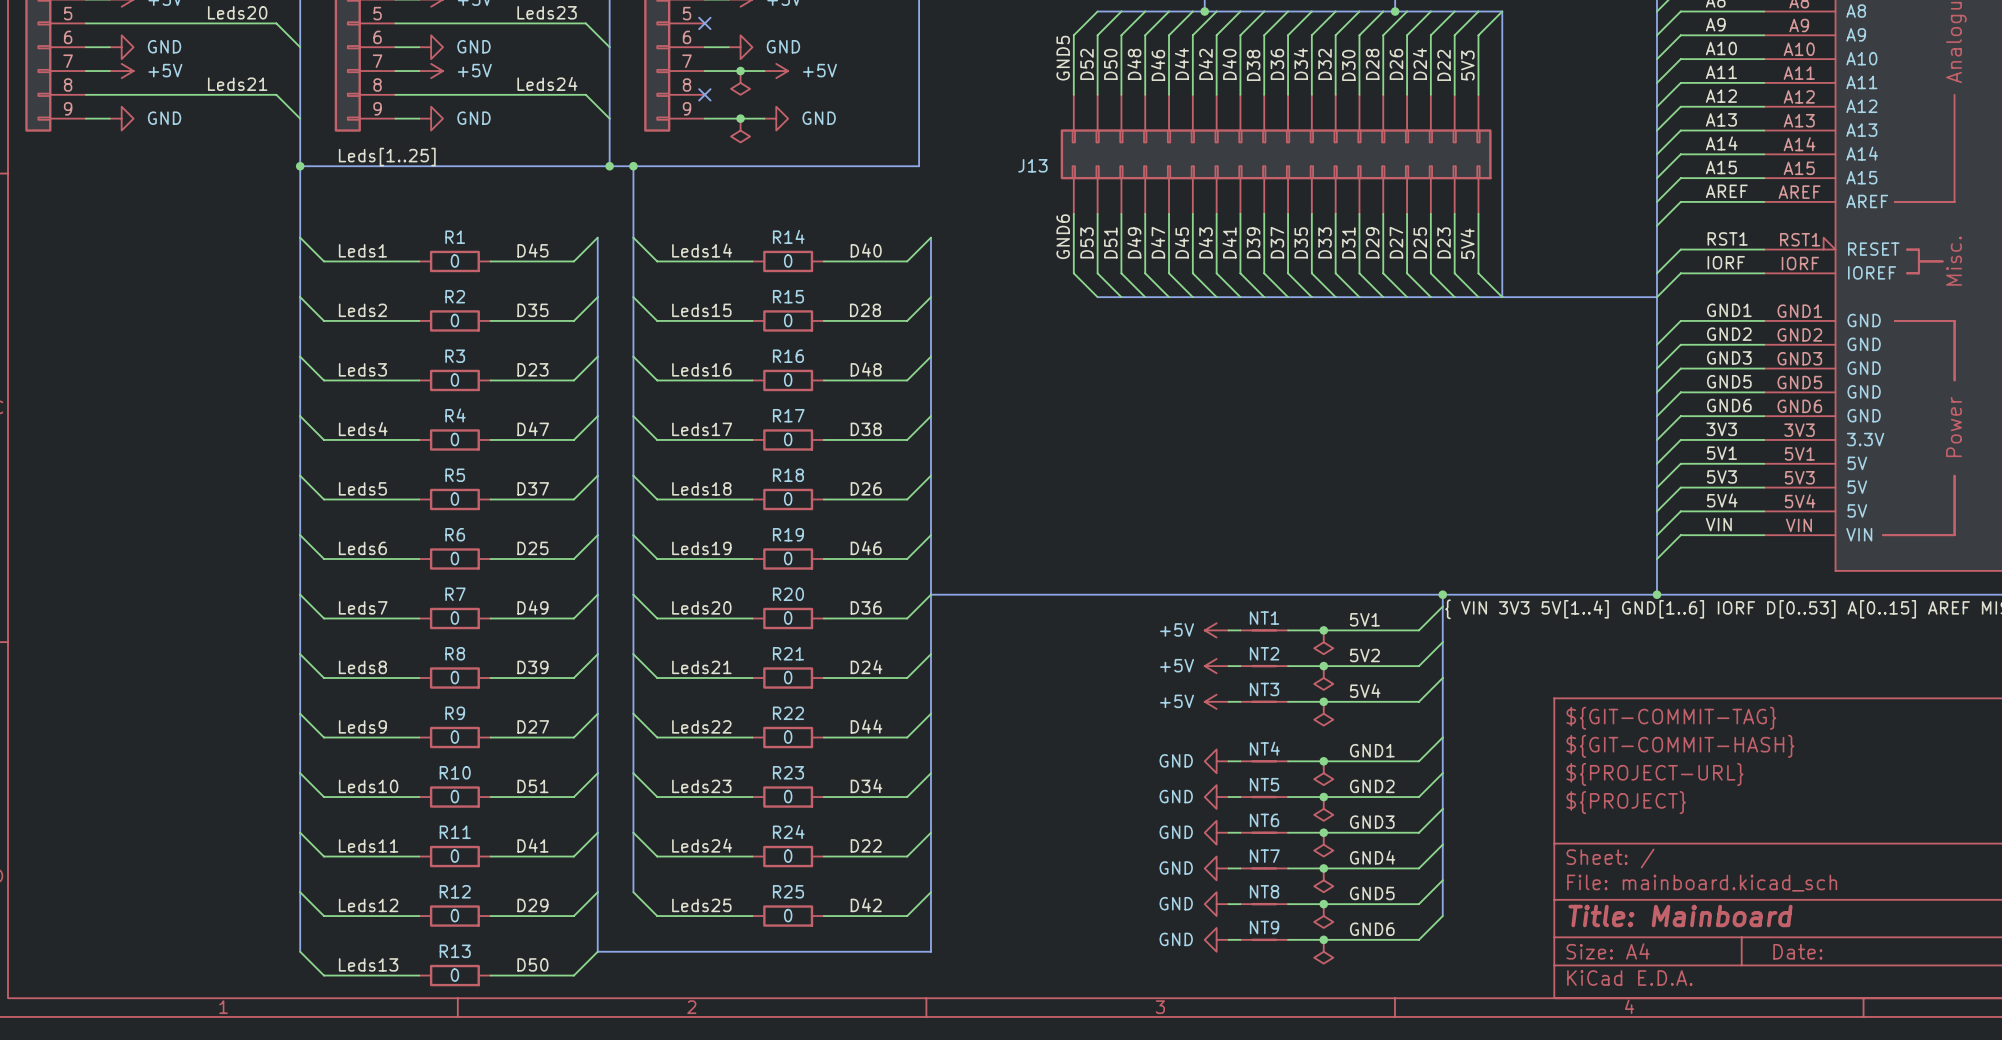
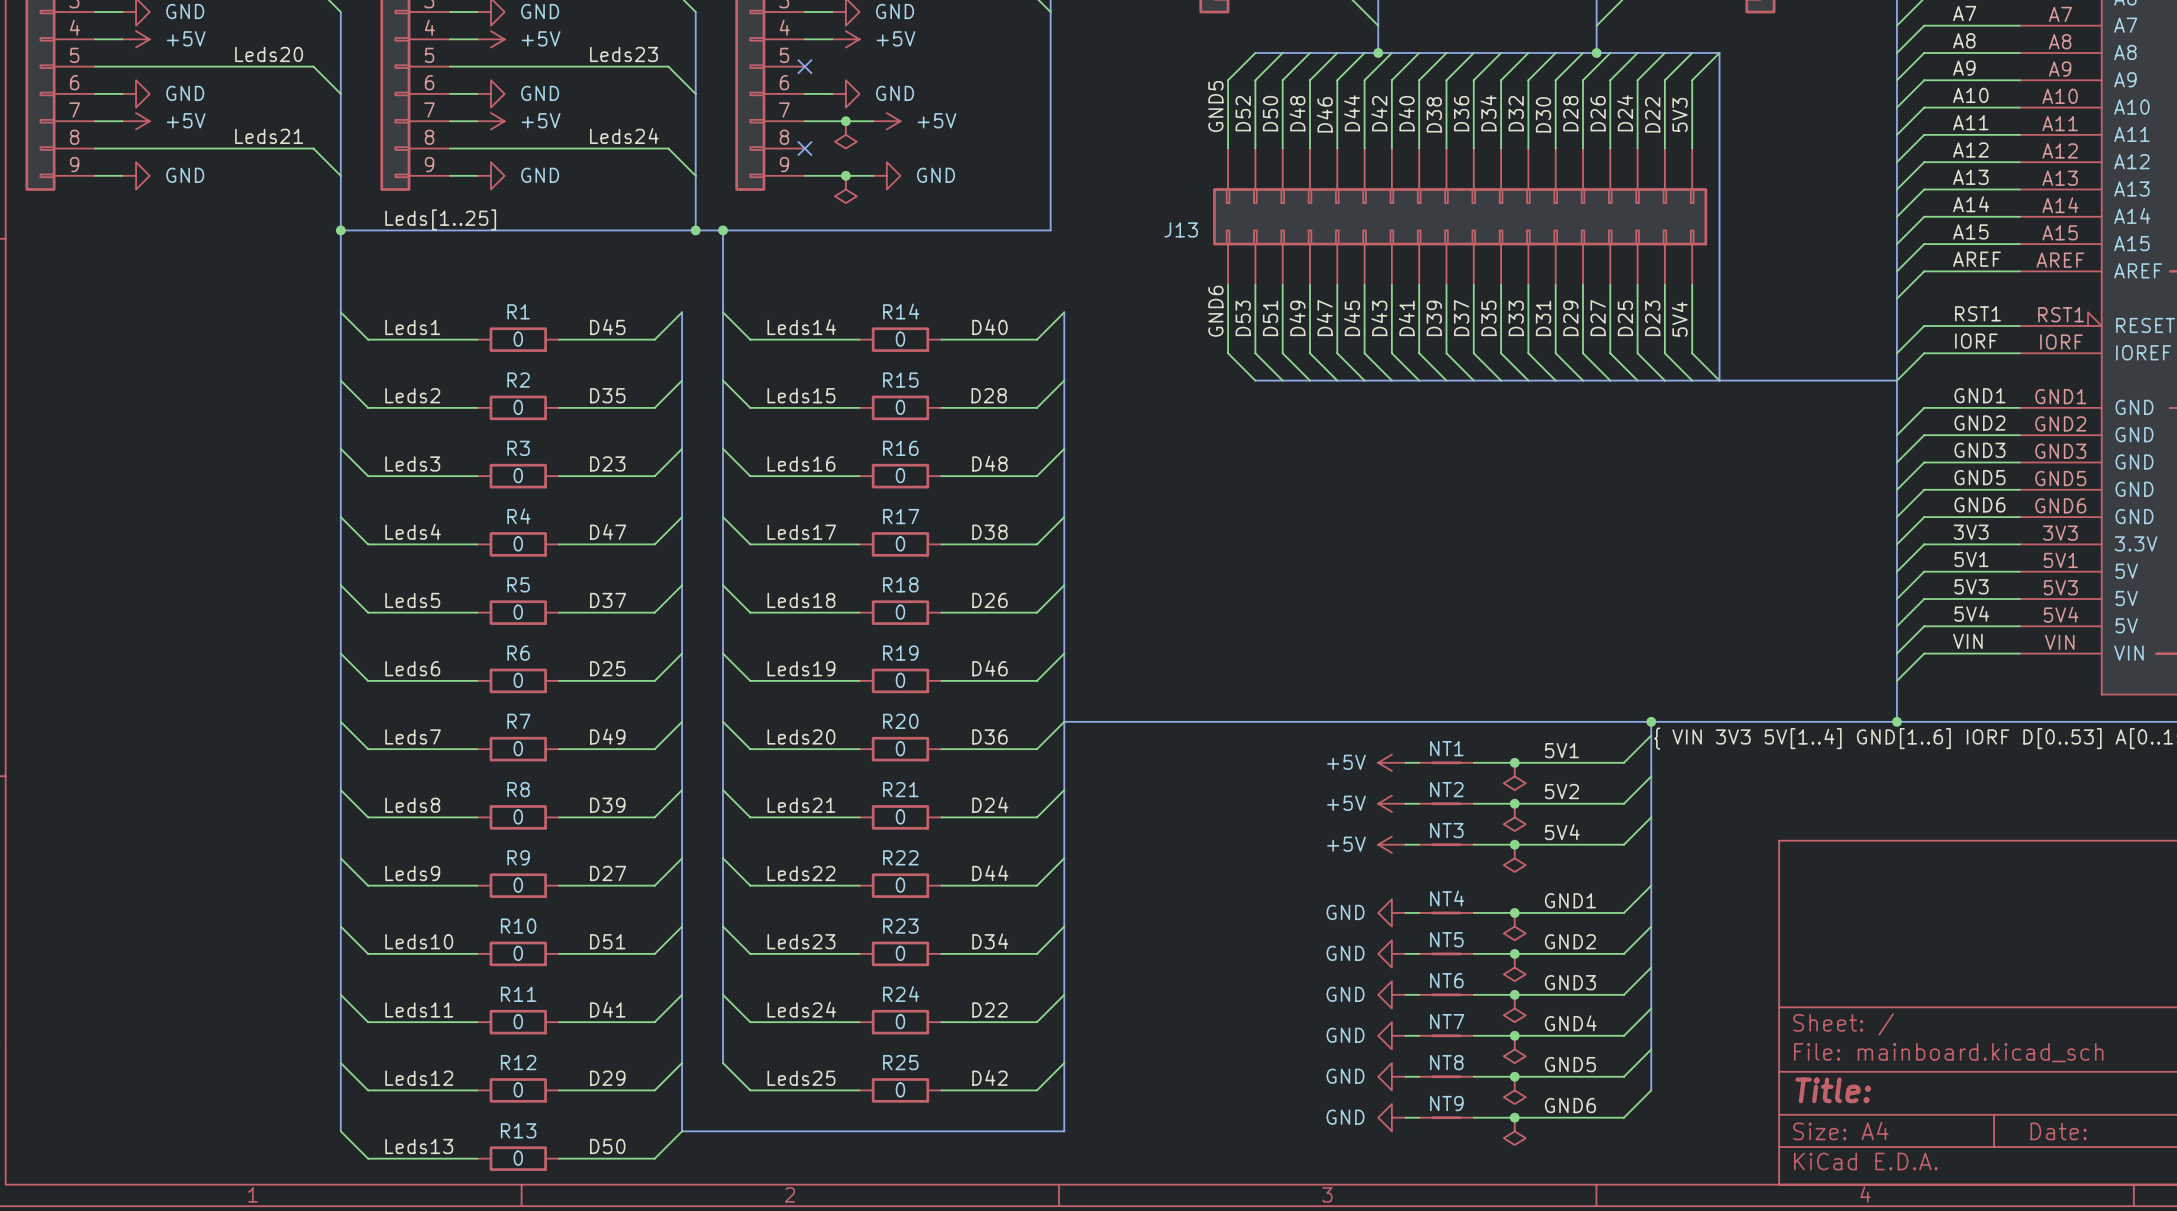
title block: ${GIT-COMMIT-TAG} (1671, 718) -> none
title block: ${GIT-COMMIT-HASH} (1680, 746) -> none
title block: ${PROJECT-URL} (1654, 774) -> none
title block: ${PROJECT} (1626, 802) -> none
title block: Title: Mainboard (1680, 916) -> Title: (1833, 1090)

